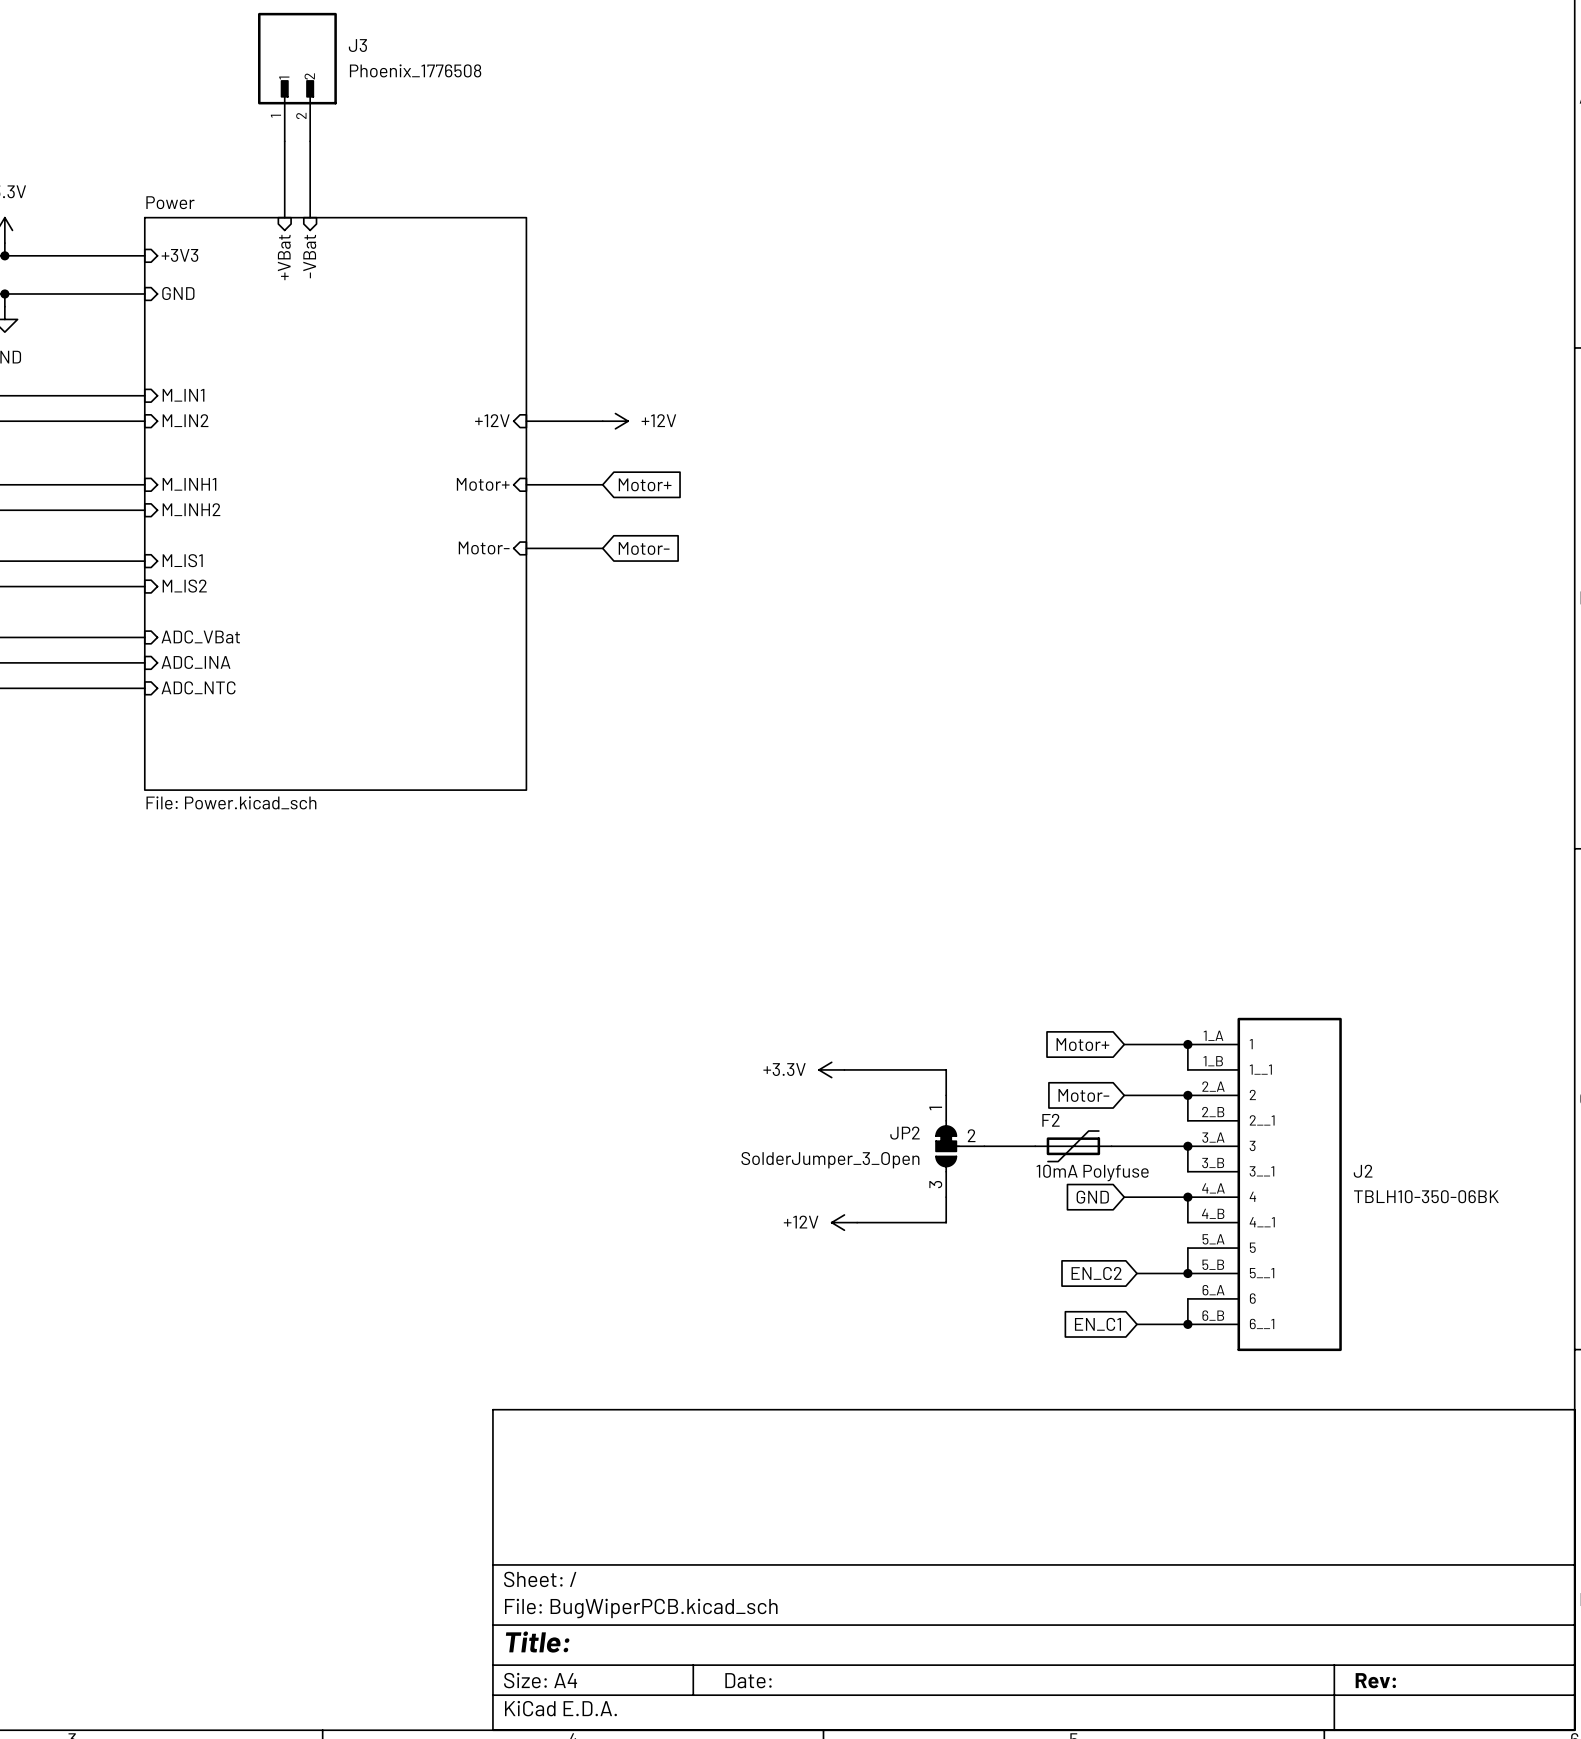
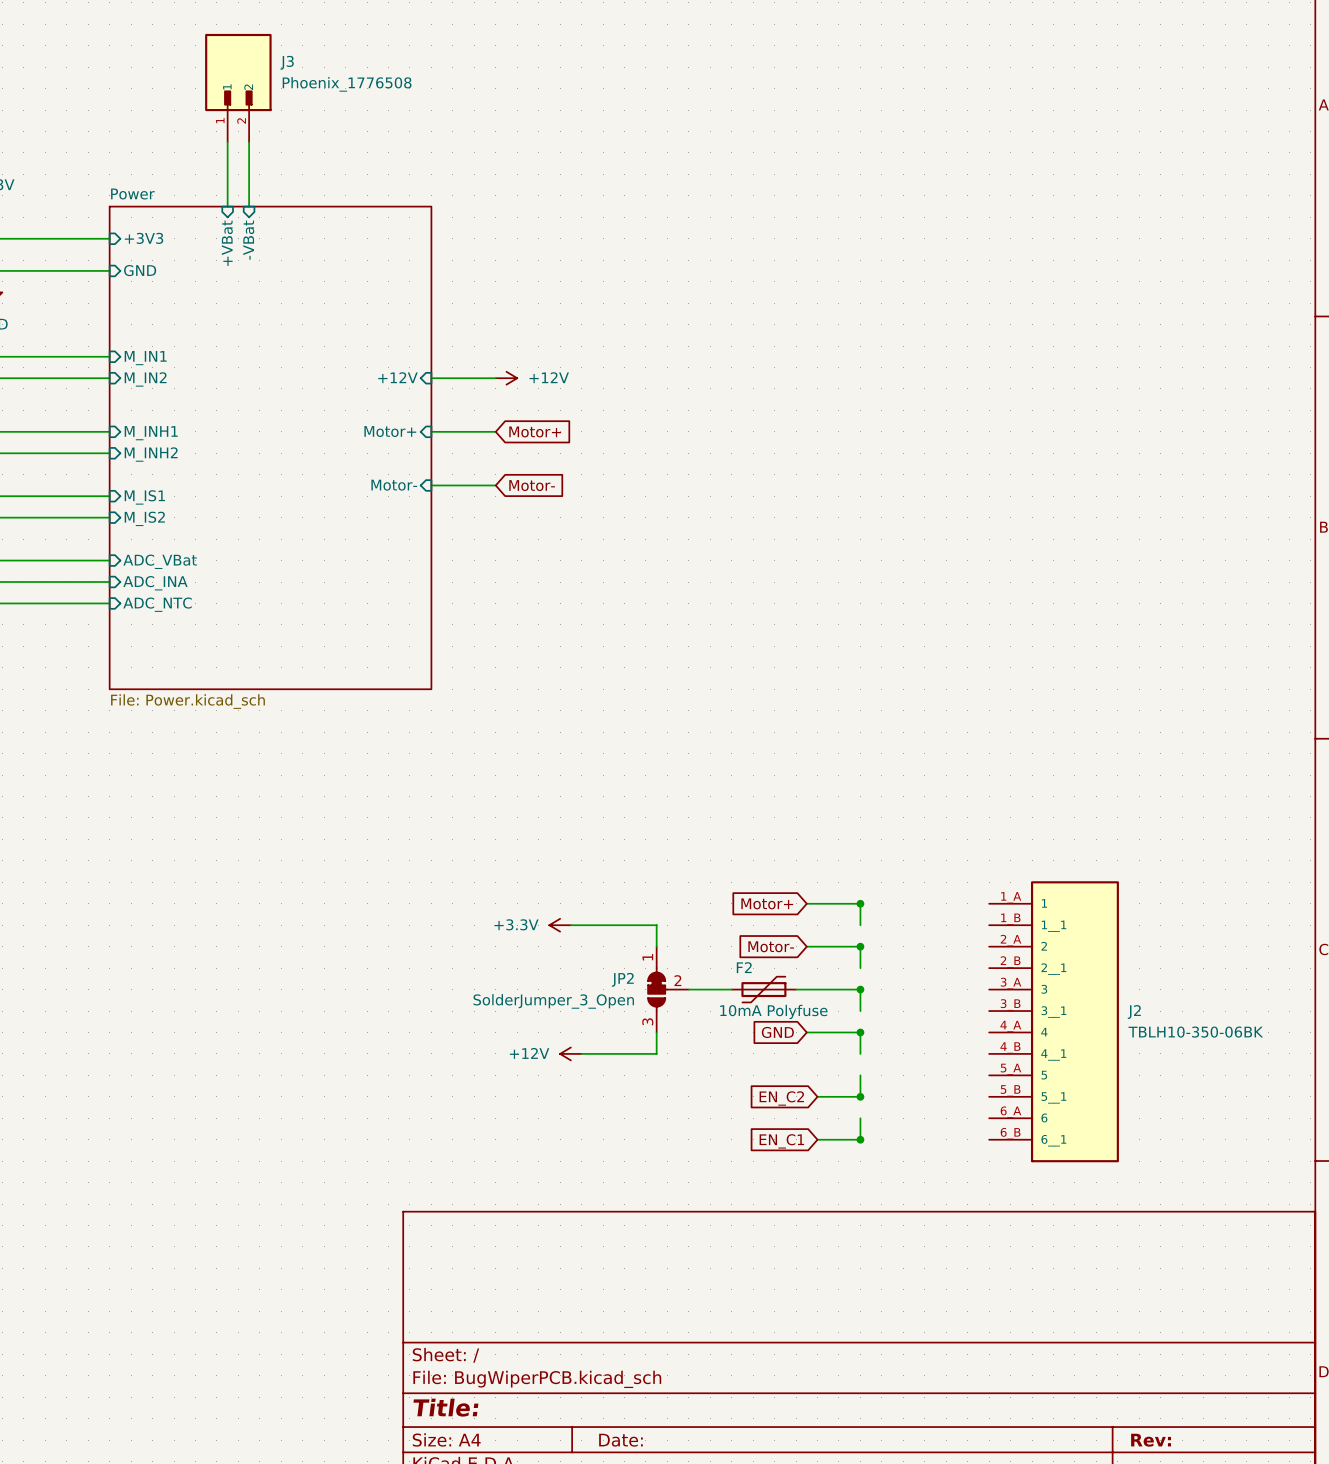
junction: none -> (860, 903)
global label position: Motor+ (1082, 1044) -> Motor+ (767, 903)
wire: (1124, 1044) (1187, 1044) (1187, 1069) -> (806, 903) (860, 903) (860, 925)
junction: (1187, 1044) -> none
power symbol position: +3.3V (831, 1069) -> +3.3V (560, 925)
wire: (844, 1069) (946, 1069) (946, 1095) -> (570, 925) (656, 925) (656, 946)
junction: none -> (860, 946)
global label position: Motor- (1083, 1095) -> Motor- (771, 946)
wire: (1124, 1095) (1187, 1095) (1187, 1120) -> (806, 946) (860, 946) (860, 968)
junction: (1187, 1095) -> none
wire: none -> (688, 989) (731, 989)
JP2 position: (960, 1146) -> (668, 989)
wire: none -> (860, 989) (860, 1011)
junction: none -> (860, 989)
F2 position: (1073, 1146) -> (763, 989)
wire: (1111, 1146) (1187, 1146) (1187, 1171) -> none
junction: (1187, 1146) -> none
wire: (946, 1197) (946, 1222) (857, 1222) -> (656, 1032) (656, 1053) (581, 1053)
junction: none -> (860, 1032)
global label position: GND (1092, 1197) -> GND (777, 1032)
wire: (1124, 1197) (1187, 1197) (1187, 1222) -> (806, 1032) (860, 1032) (860, 1053)
junction: (1187, 1197) -> none
power symbol position: +12V (844, 1222) -> +12V (570, 1053)
wire: (1187, 1248) (1187, 1273) (1137, 1273) -> (860, 1075) (860, 1096) (817, 1096)
junction: none -> (860, 1096)
global label position: EN_C2 (1096, 1273) -> EN_C2 (781, 1098)
junction: (1187, 1273) -> none
wire: (1187, 1298) (1187, 1324) (1137, 1324) -> (860, 1118) (860, 1139) (817, 1139)
junction: none -> (860, 1139)
global label position: EN_C1 (1097, 1324) -> EN_C1 (781, 1141)
junction: (1187, 1324) -> none

